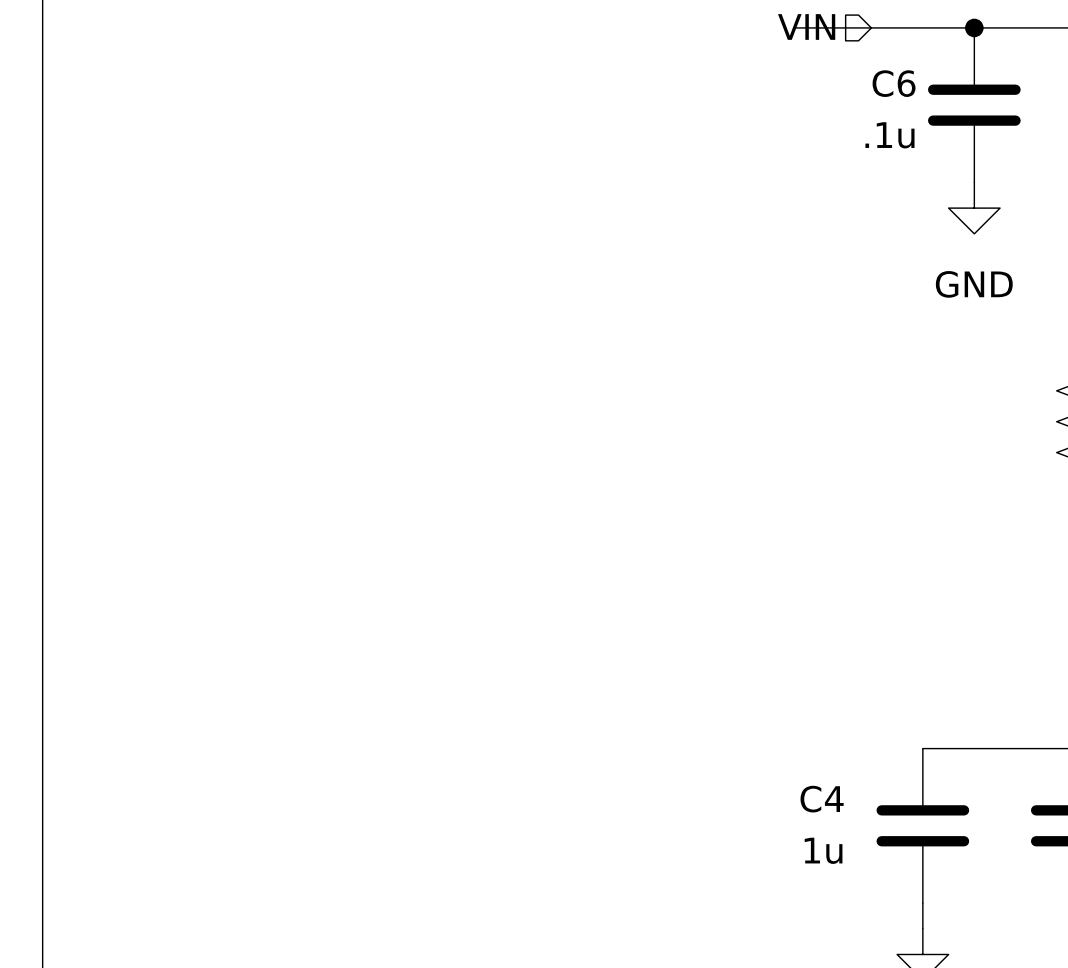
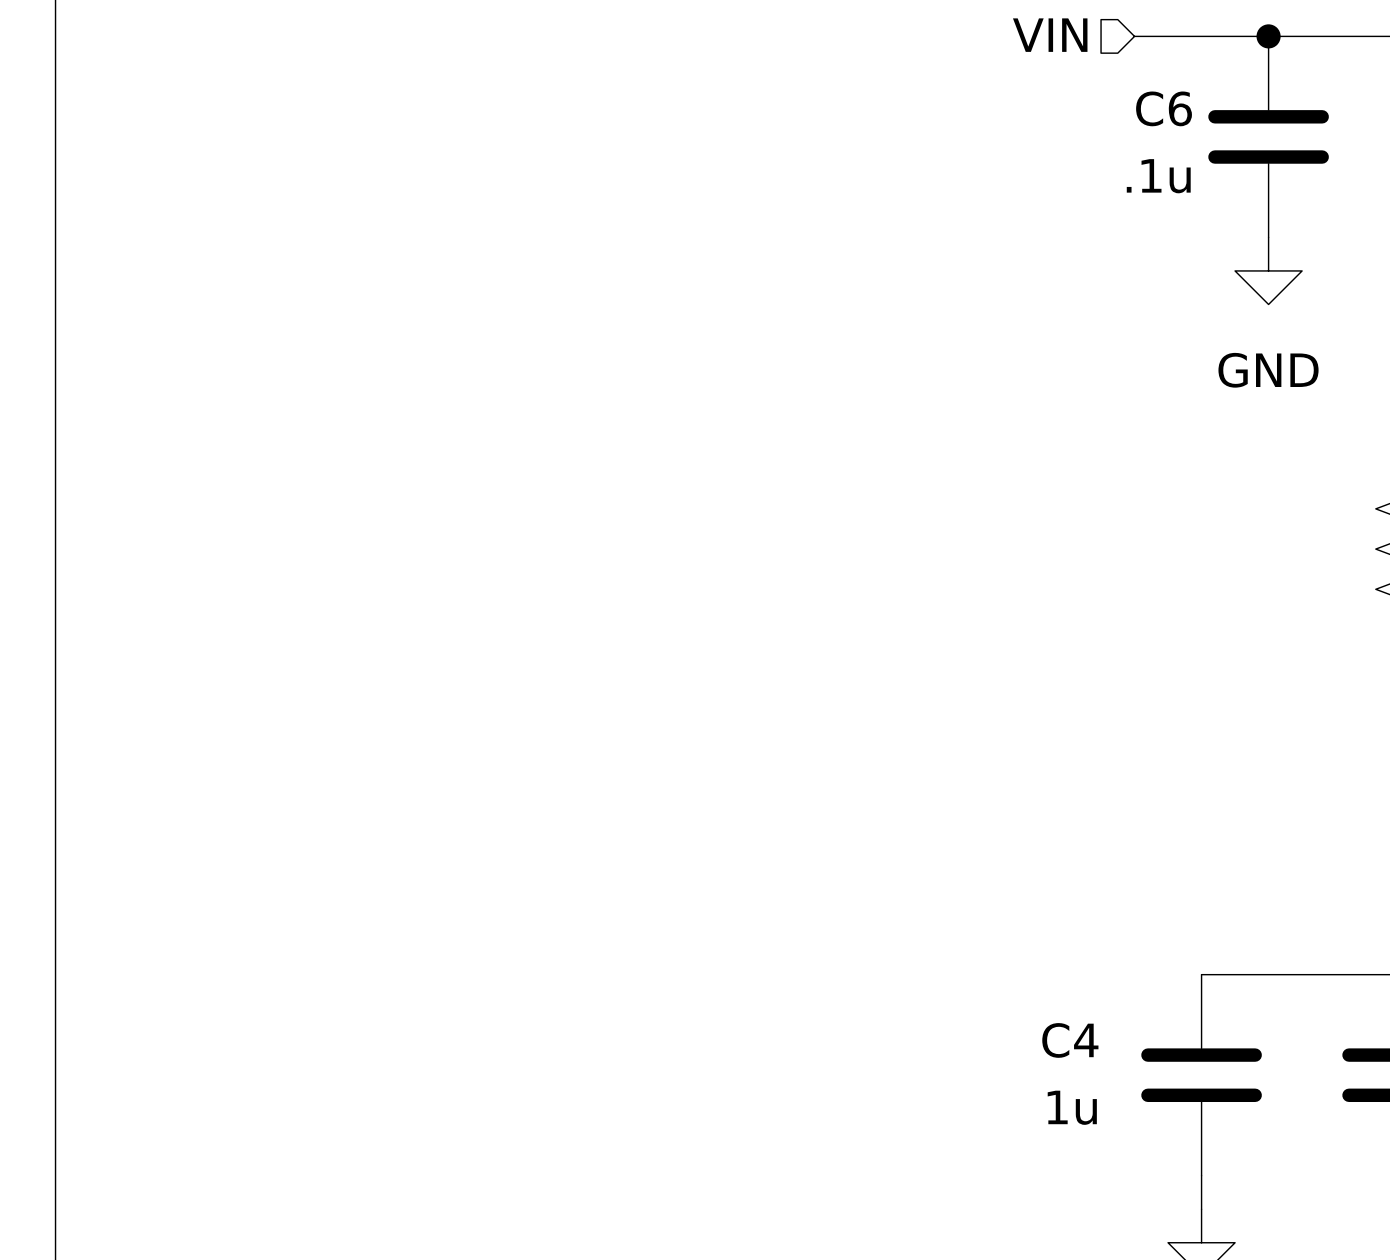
wire: (794, 27) (871, 27) -> none

